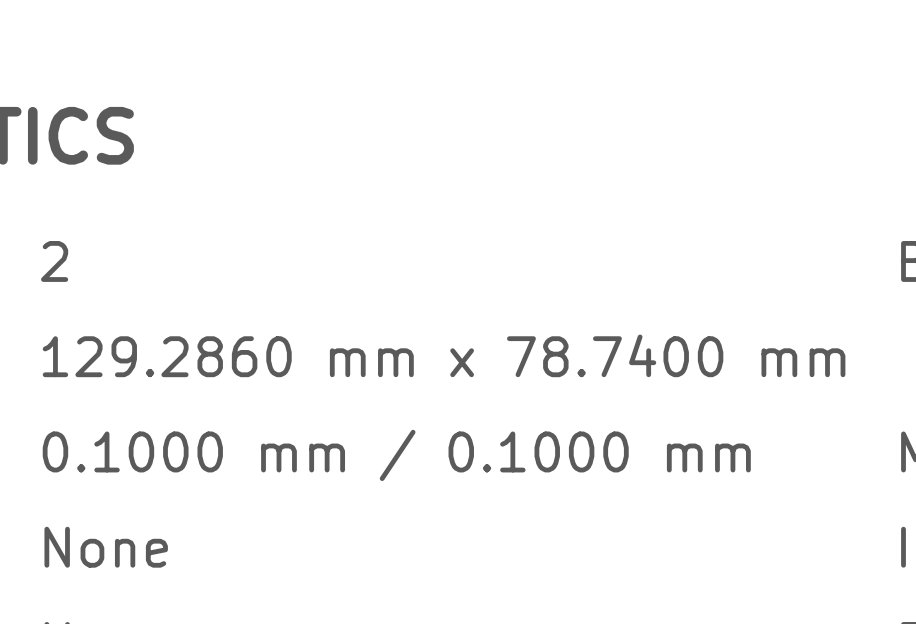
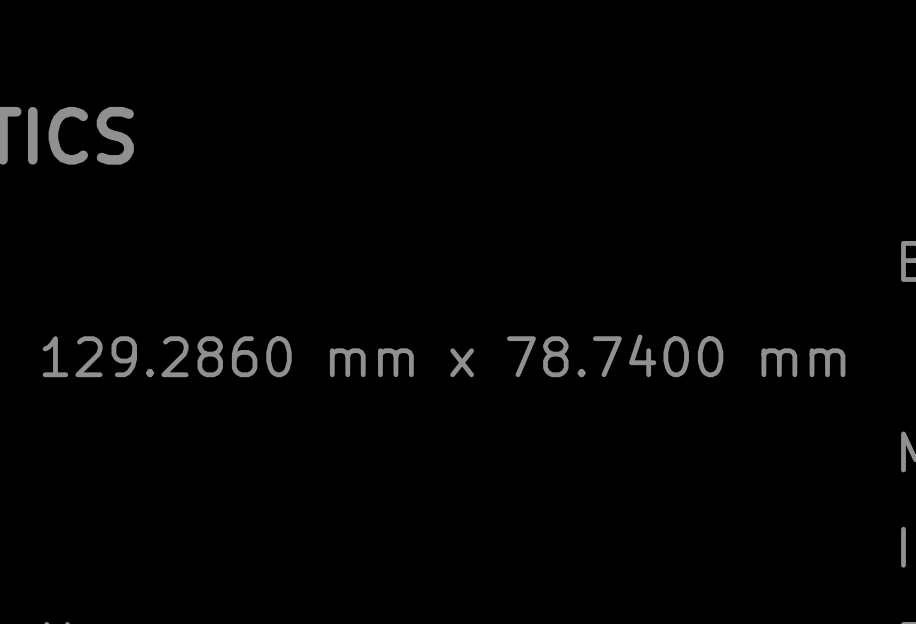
text: 2 (54, 261) -> none
text: 0.1000 mm / 0.1000 mm (396, 455) -> none
text: None (106, 547) -> none

